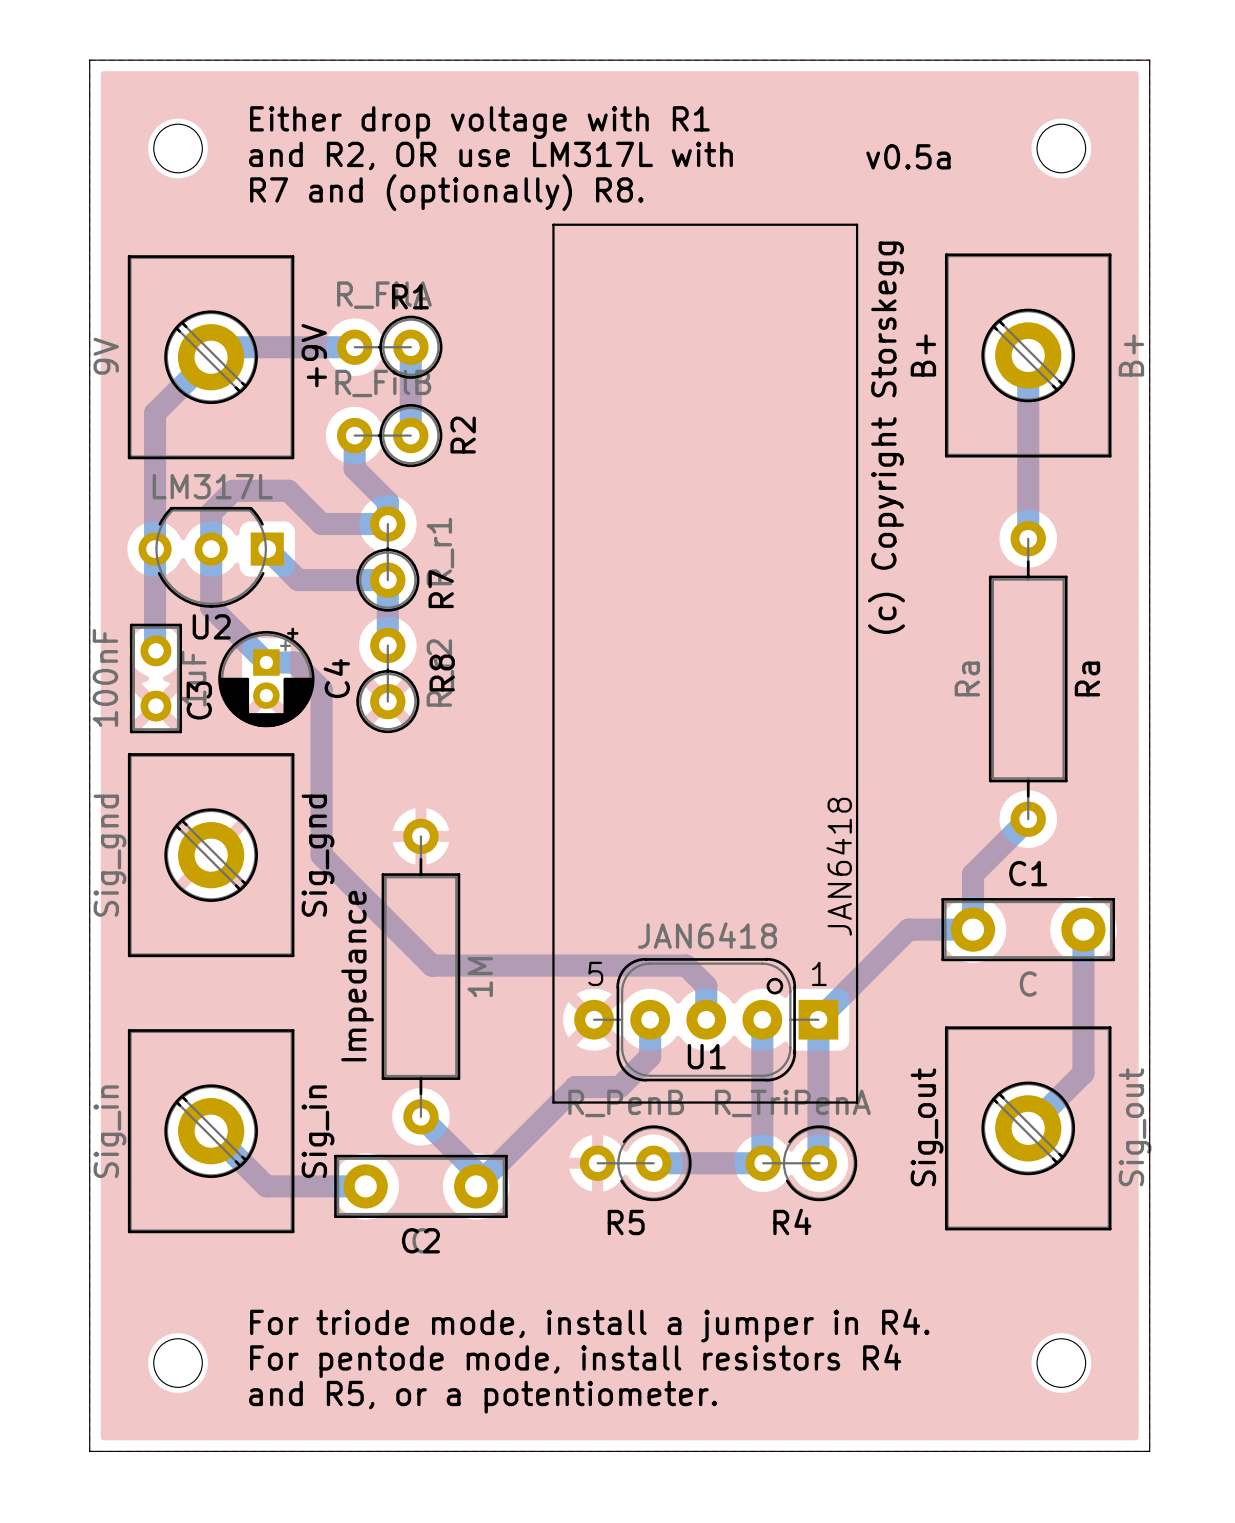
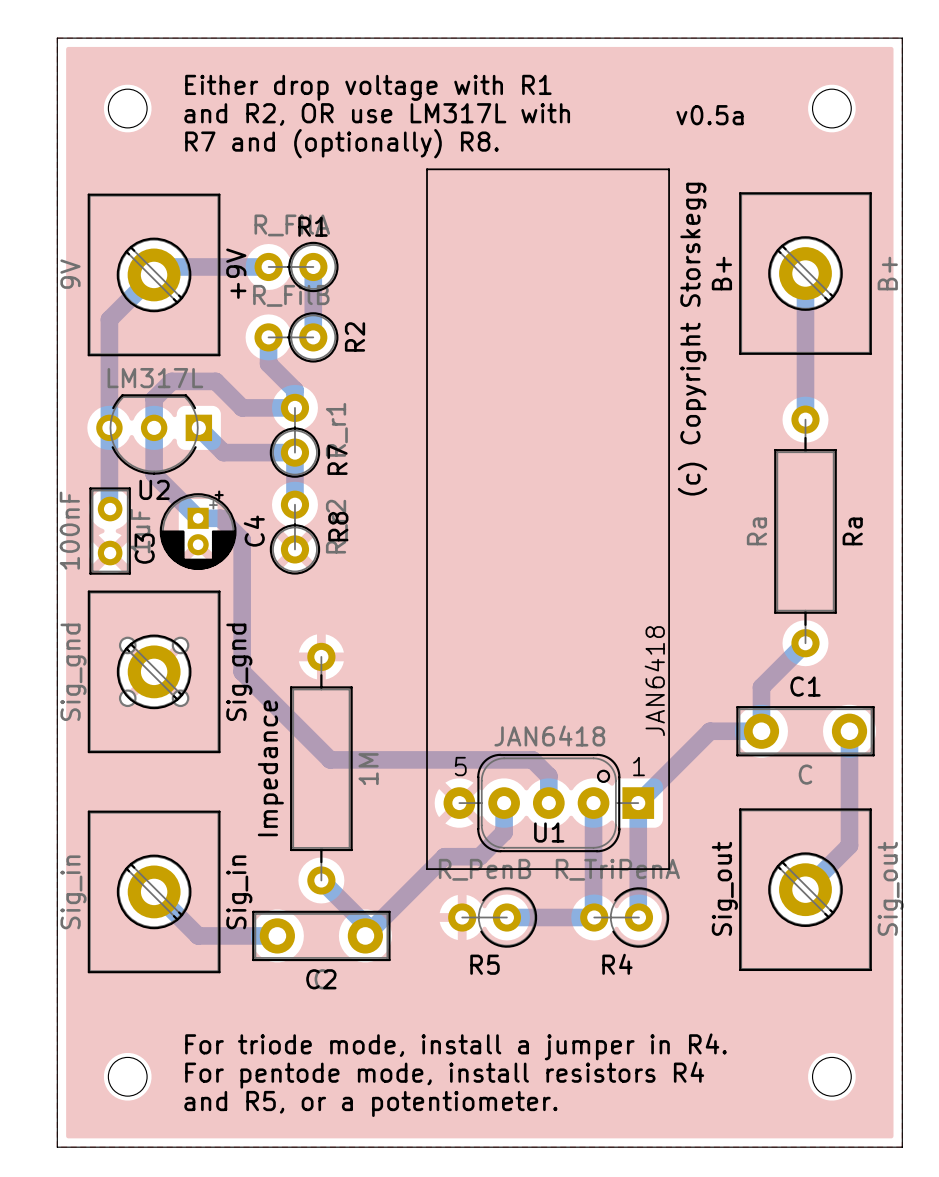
via: none -> (127, 645)
via: none -> (180, 645)
via: none -> (127, 698)
via: none -> (180, 698)

